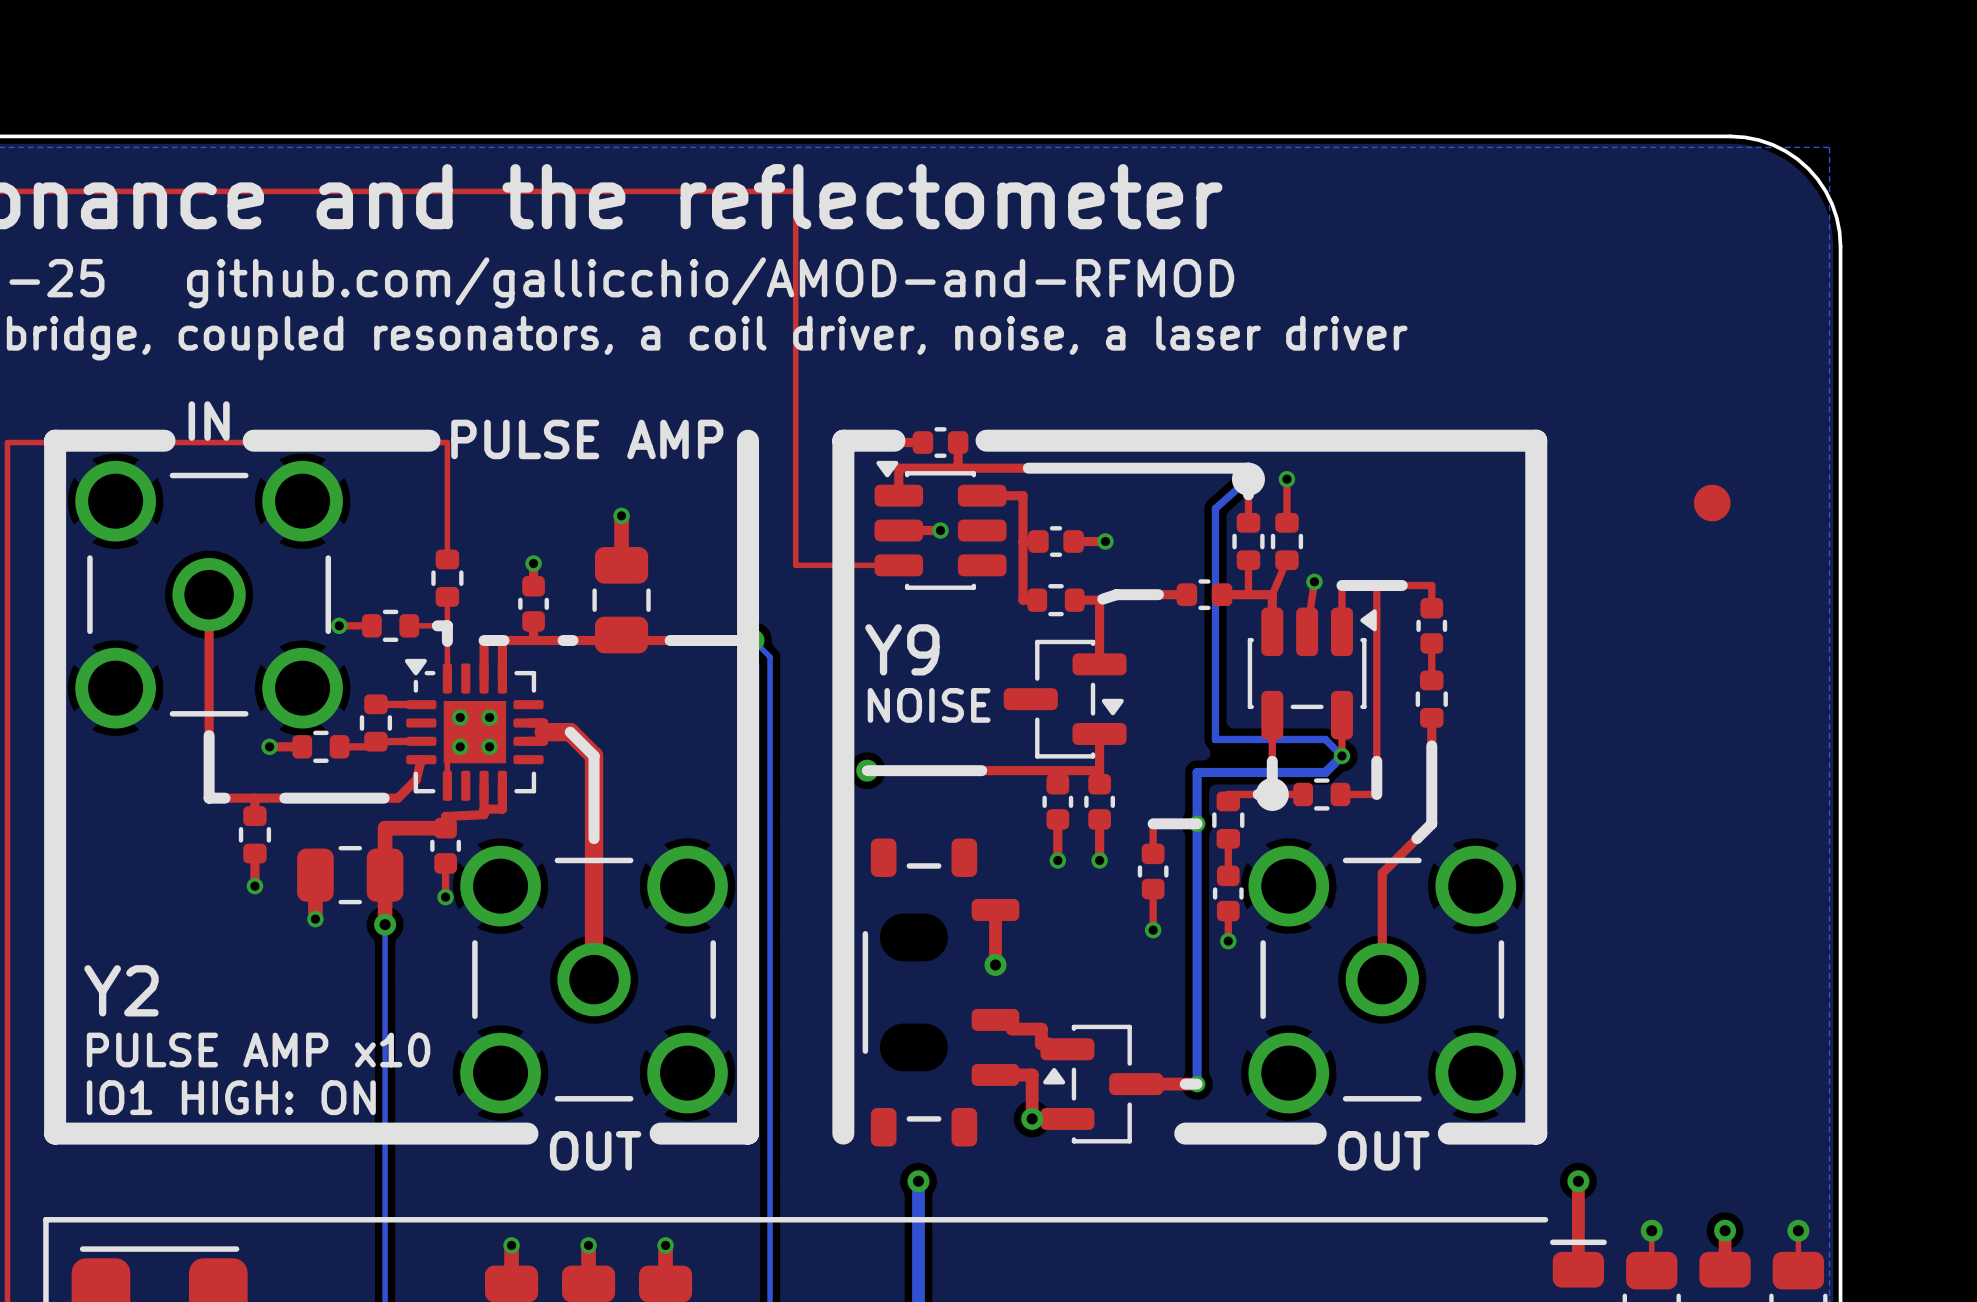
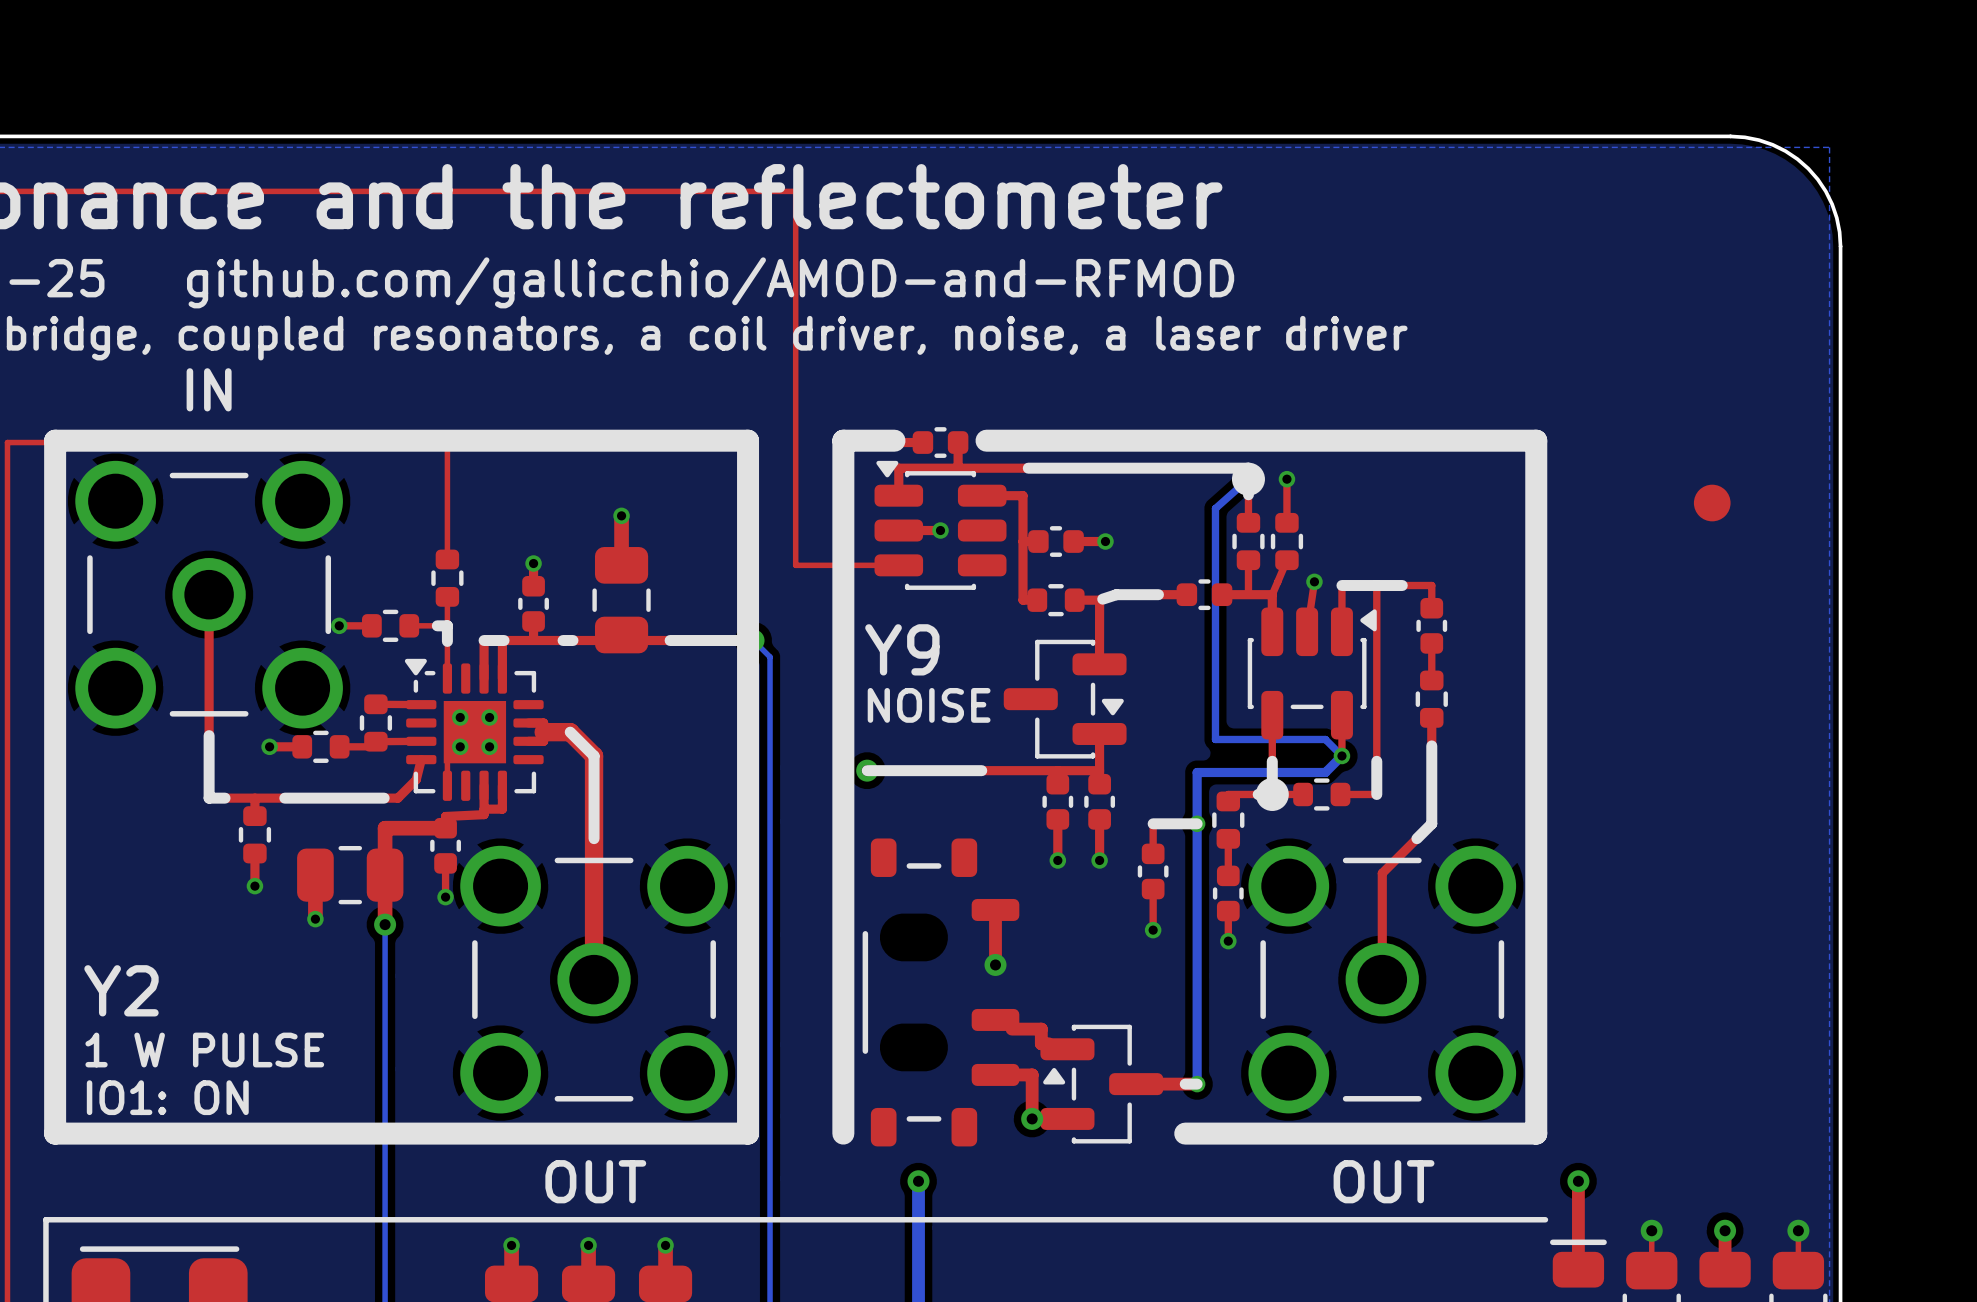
text position: IN (209, 421) -> IN (209, 389)
text: PULSE AMP (587, 439) -> none
line: none -> (164, 440) (253, 440)
line: none -> (429, 440) (748, 440)
text: PULSE AMP x10 (258, 1050) -> 1 W PULSE (204, 1050)
text: IO1 HIGH: ON (231, 1097) -> IO1: ON (167, 1097)
line: none -> (527, 1133) (660, 1133)
line: none -> (1315, 1133) (1448, 1133)
text position: OUT (595, 1150) -> OUT (595, 1181)
text position: OUT (1383, 1150) -> OUT (1384, 1181)

